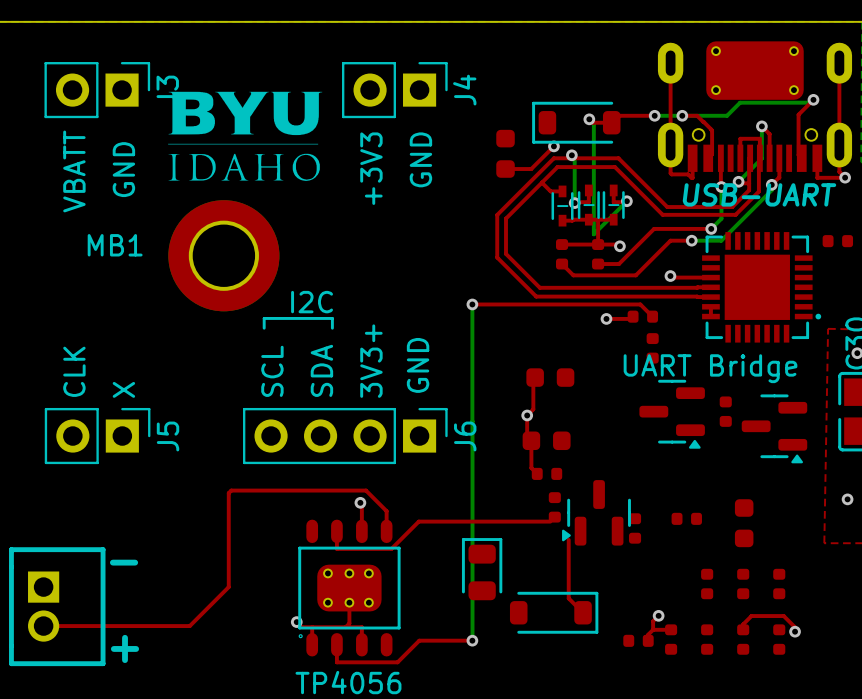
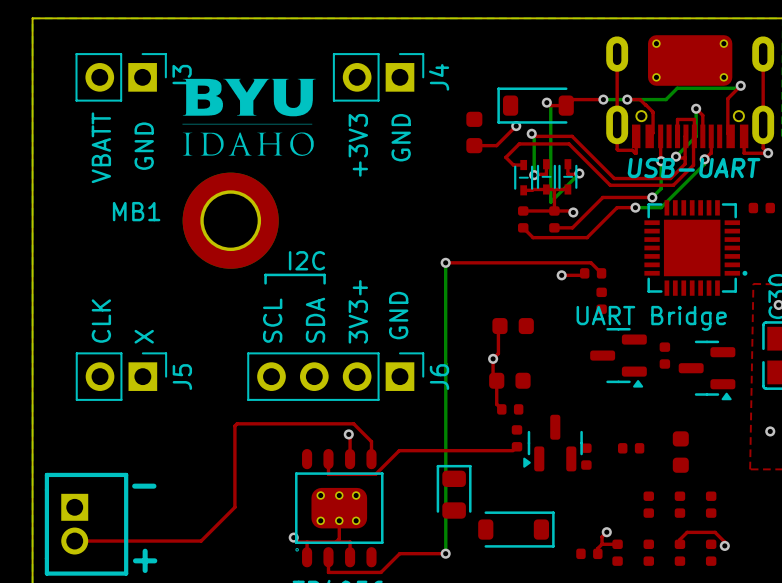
top track: (571, 158) (553, 158) (497, 214) (497, 257) (536, 296) (710, 297) -> none
top track: (541, 182) (506, 218) (506, 253) (539, 287) (710, 287) -> none
top track: (670, 276) (710, 277) -> none
via: (670, 276) -> none
top track: (710, 306) (710, 316) -> none
top track: (568, 539) (568, 598) (583, 612) -> none

